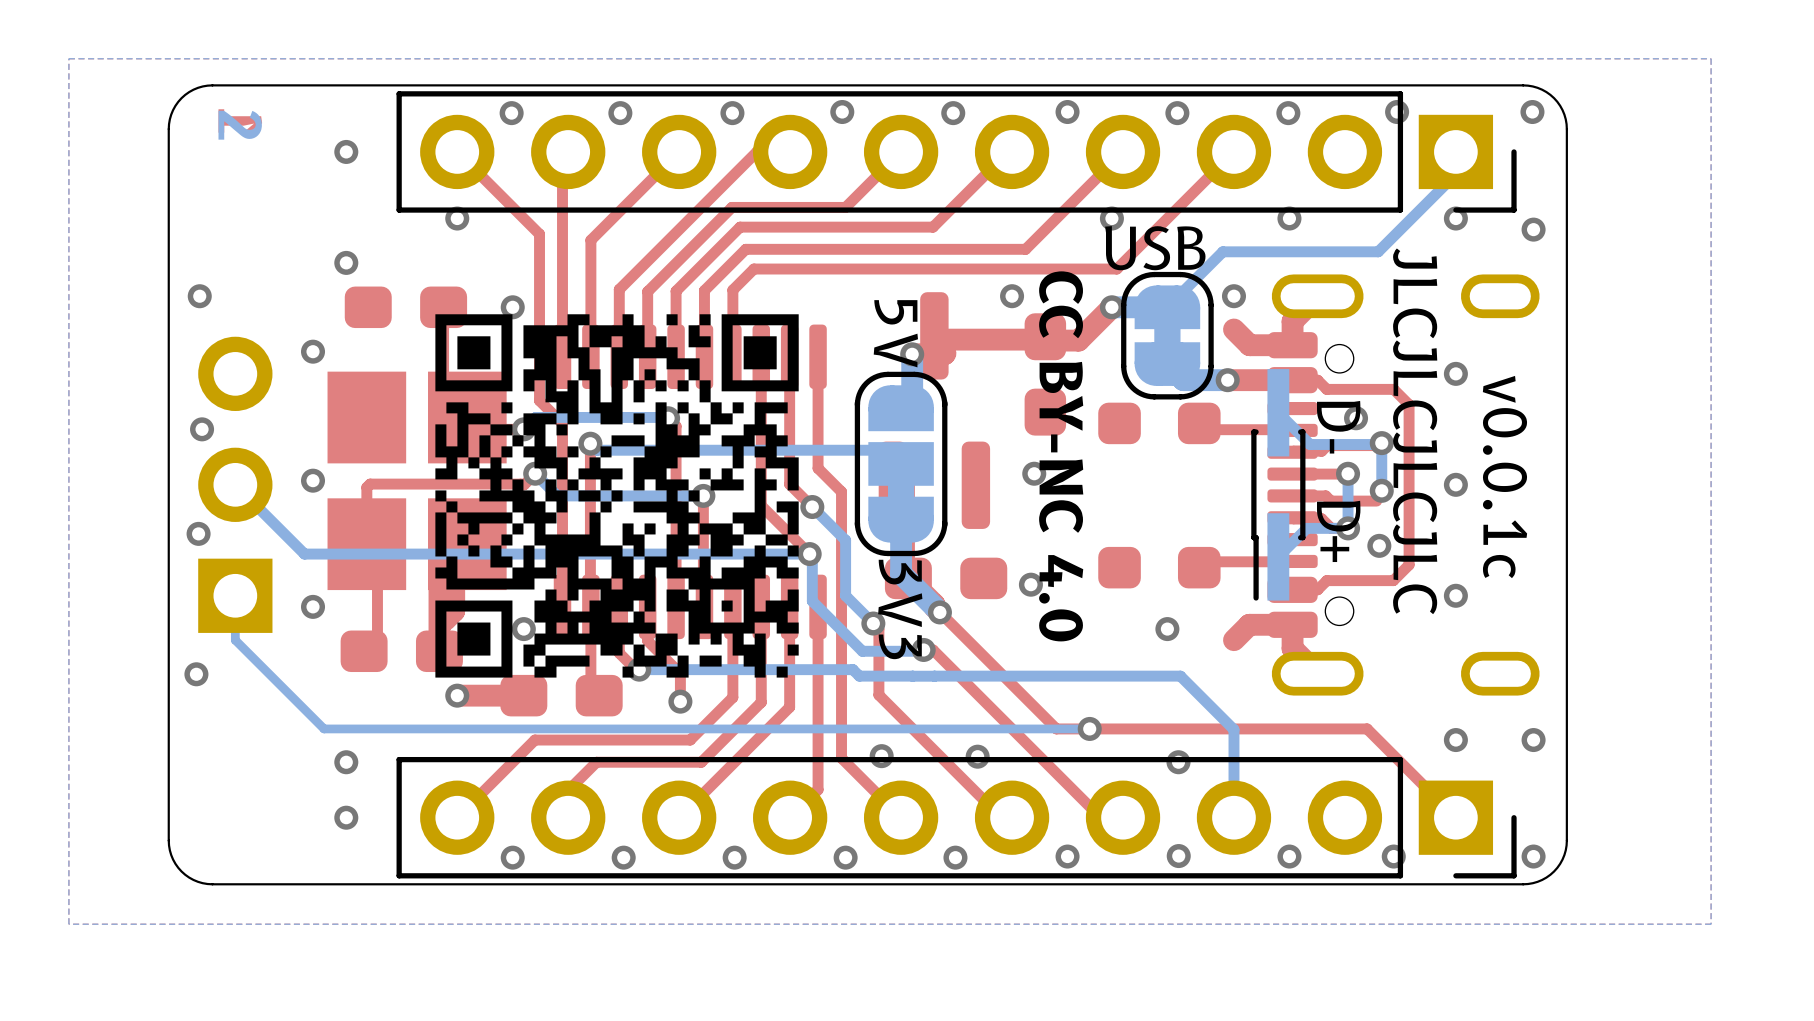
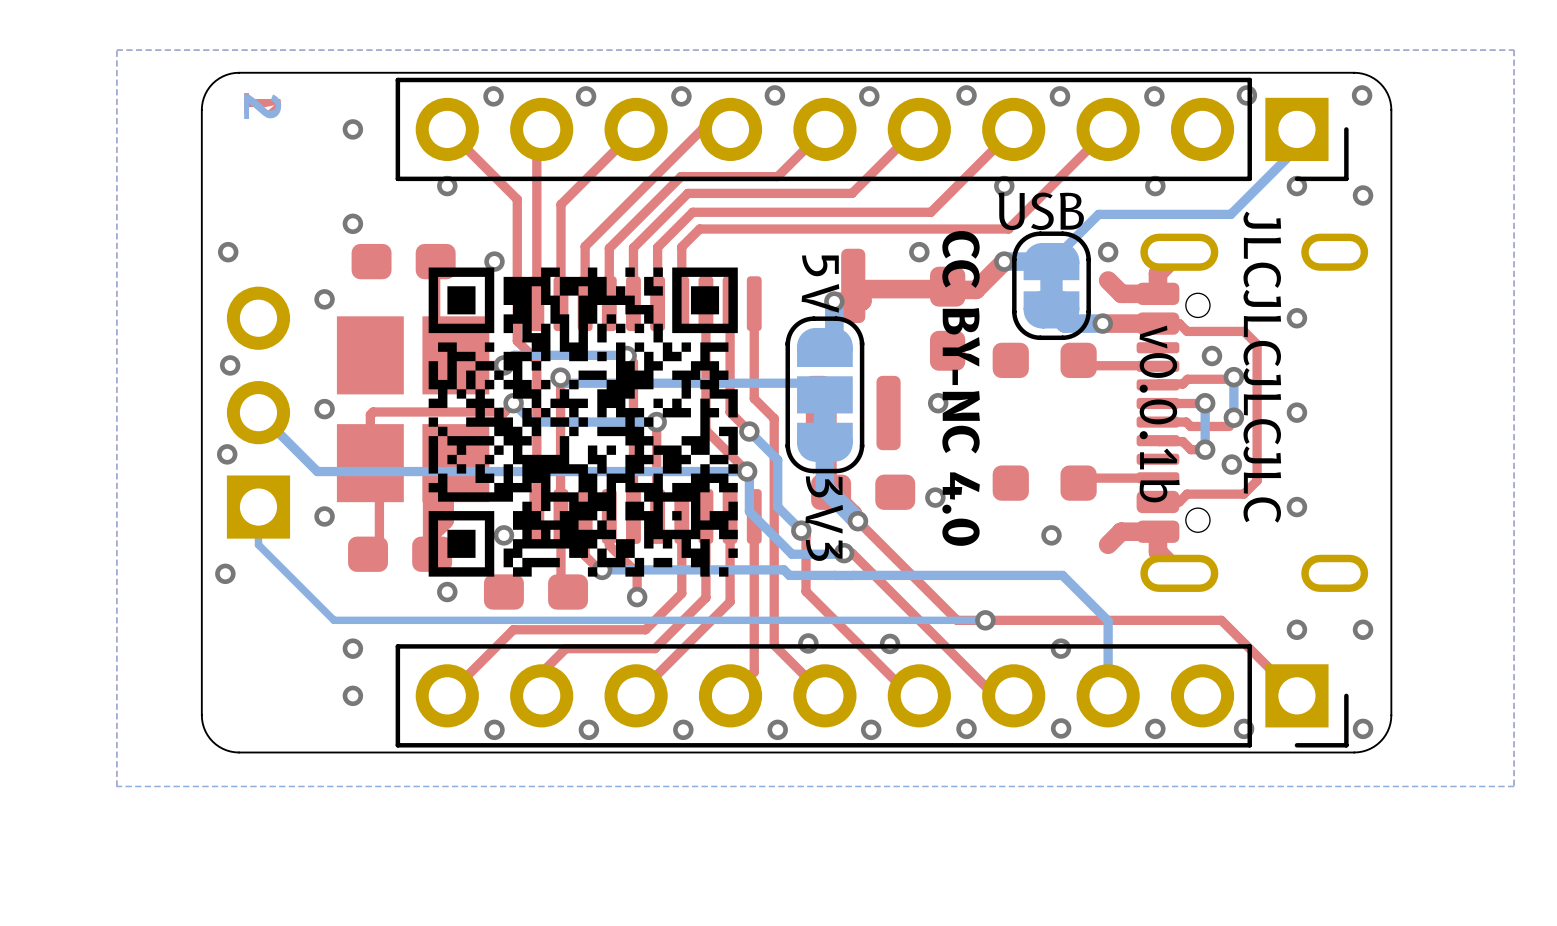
bottom track: (1278, 412) (1310, 444) (1381, 443) -> none
text: D- (1338, 427) -> none
text: v0.0.1c (1504, 477) -> none
part: (1278, 484) -> none
text: none -> v0.0.1b (1159, 414)
bottom track: (1348, 528) (1306, 528) (1278, 556) -> none
text: D+ (1338, 531) -> none
top track: (523, 695) (457, 695) -> none

